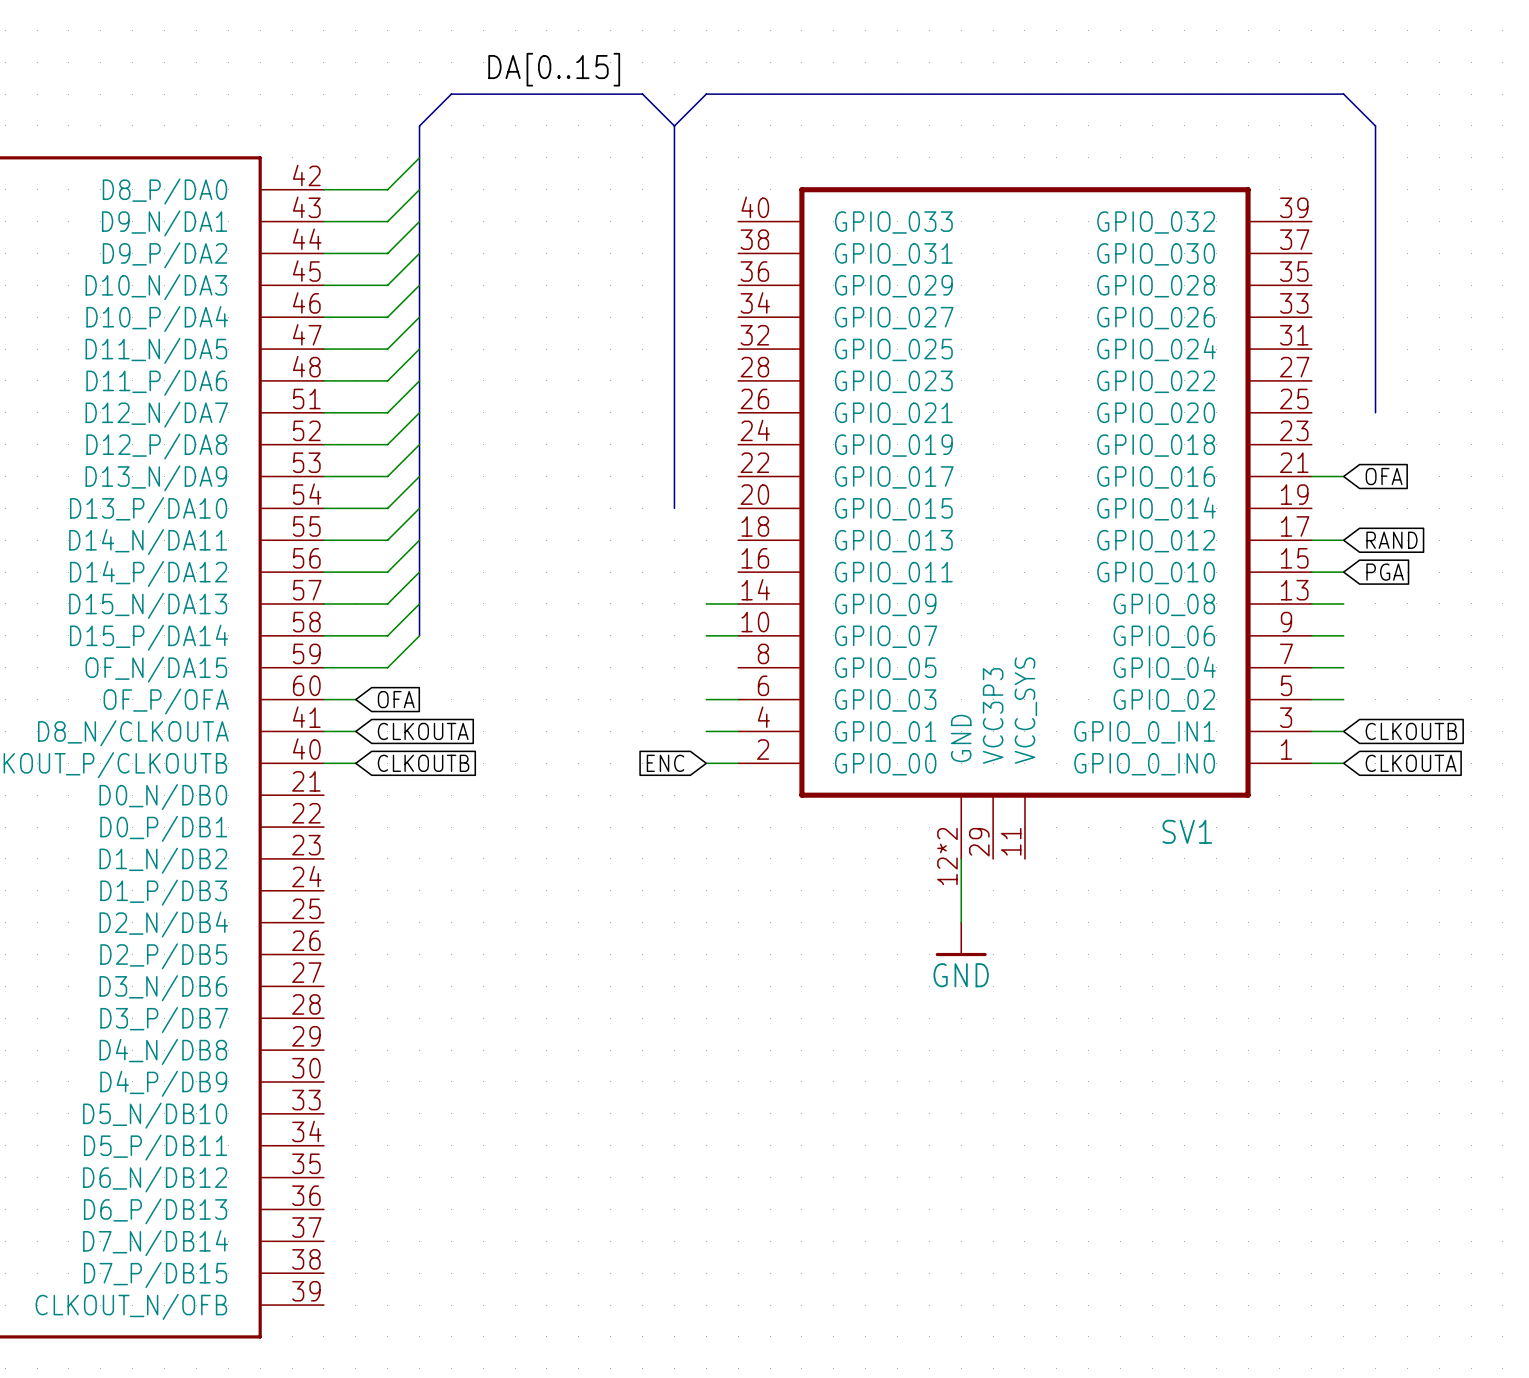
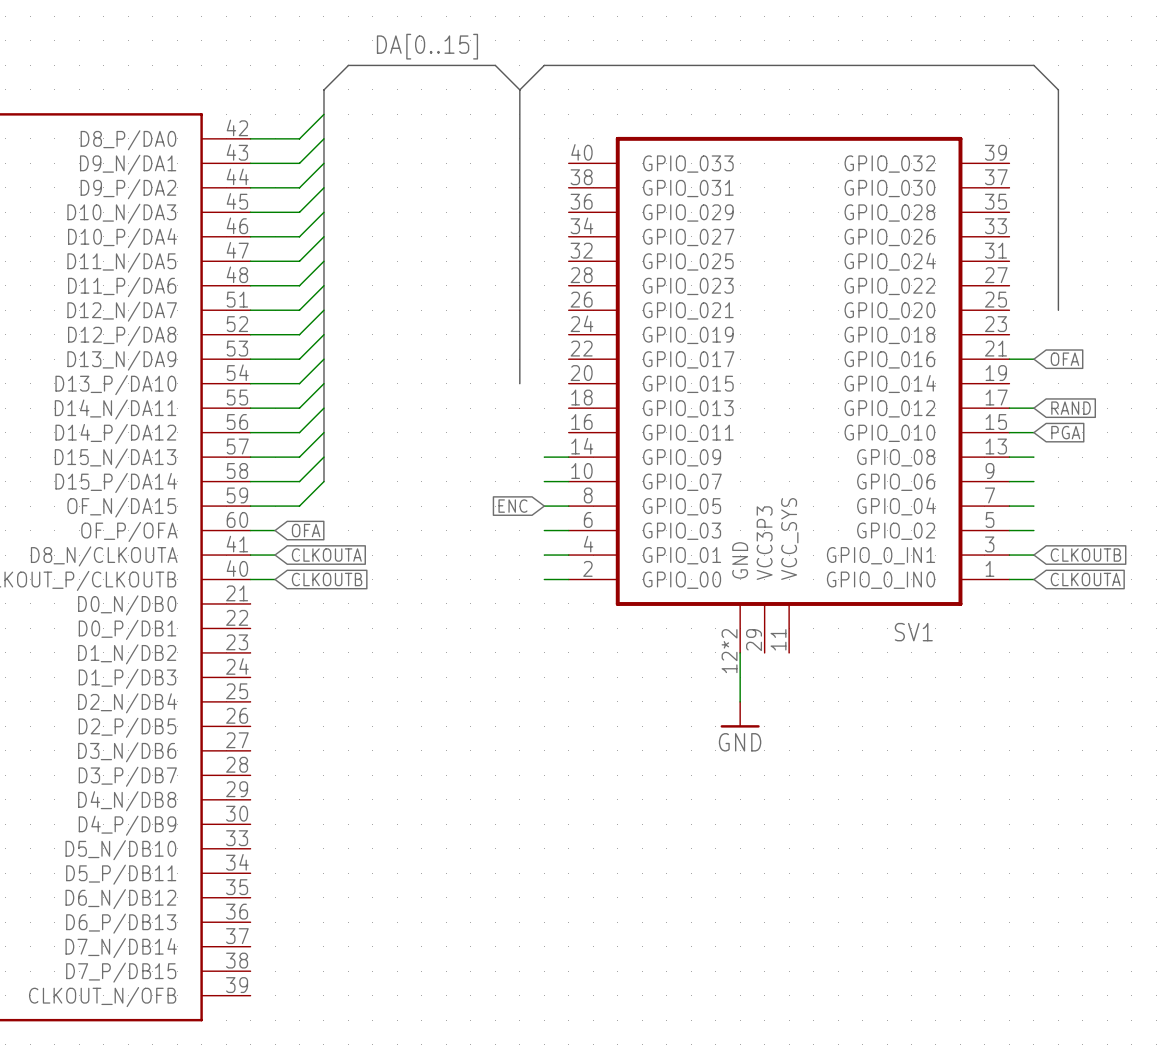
wire: none -> (544, 506) (568, 506)
global label position: ENC (665, 763) -> ENC (512, 506)

